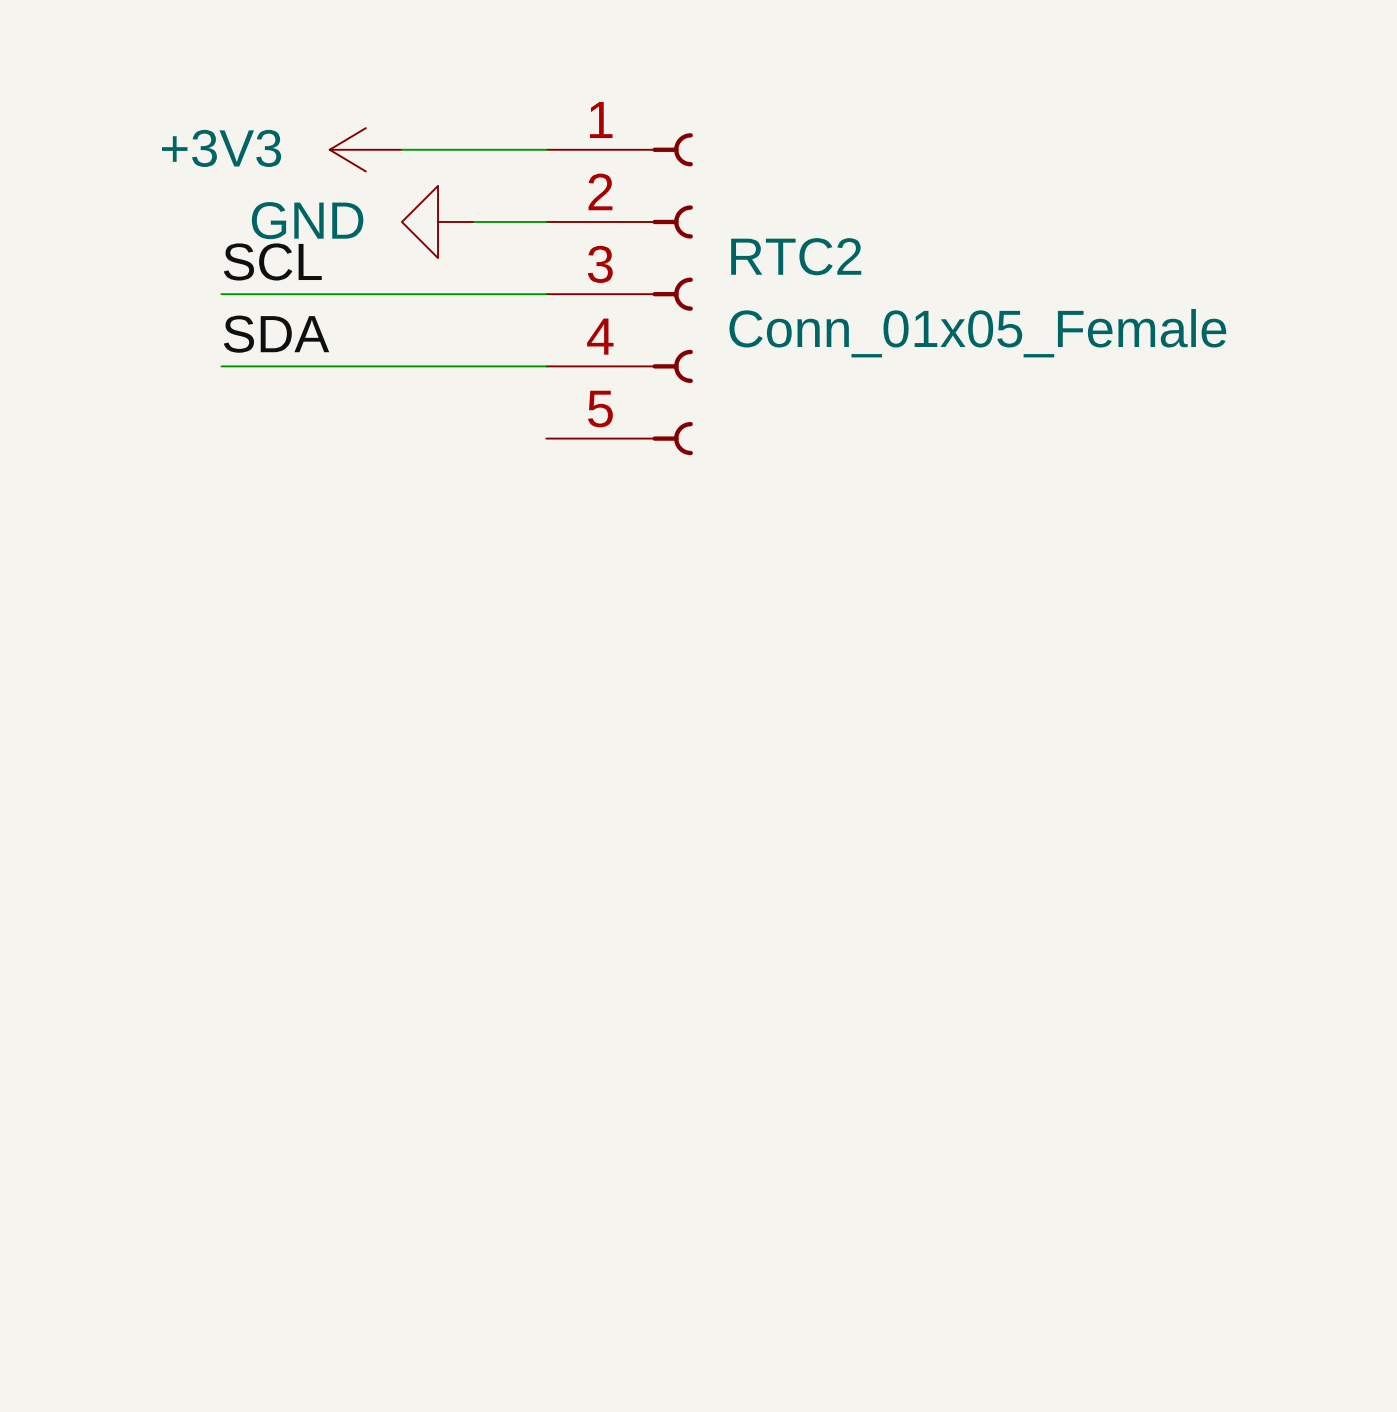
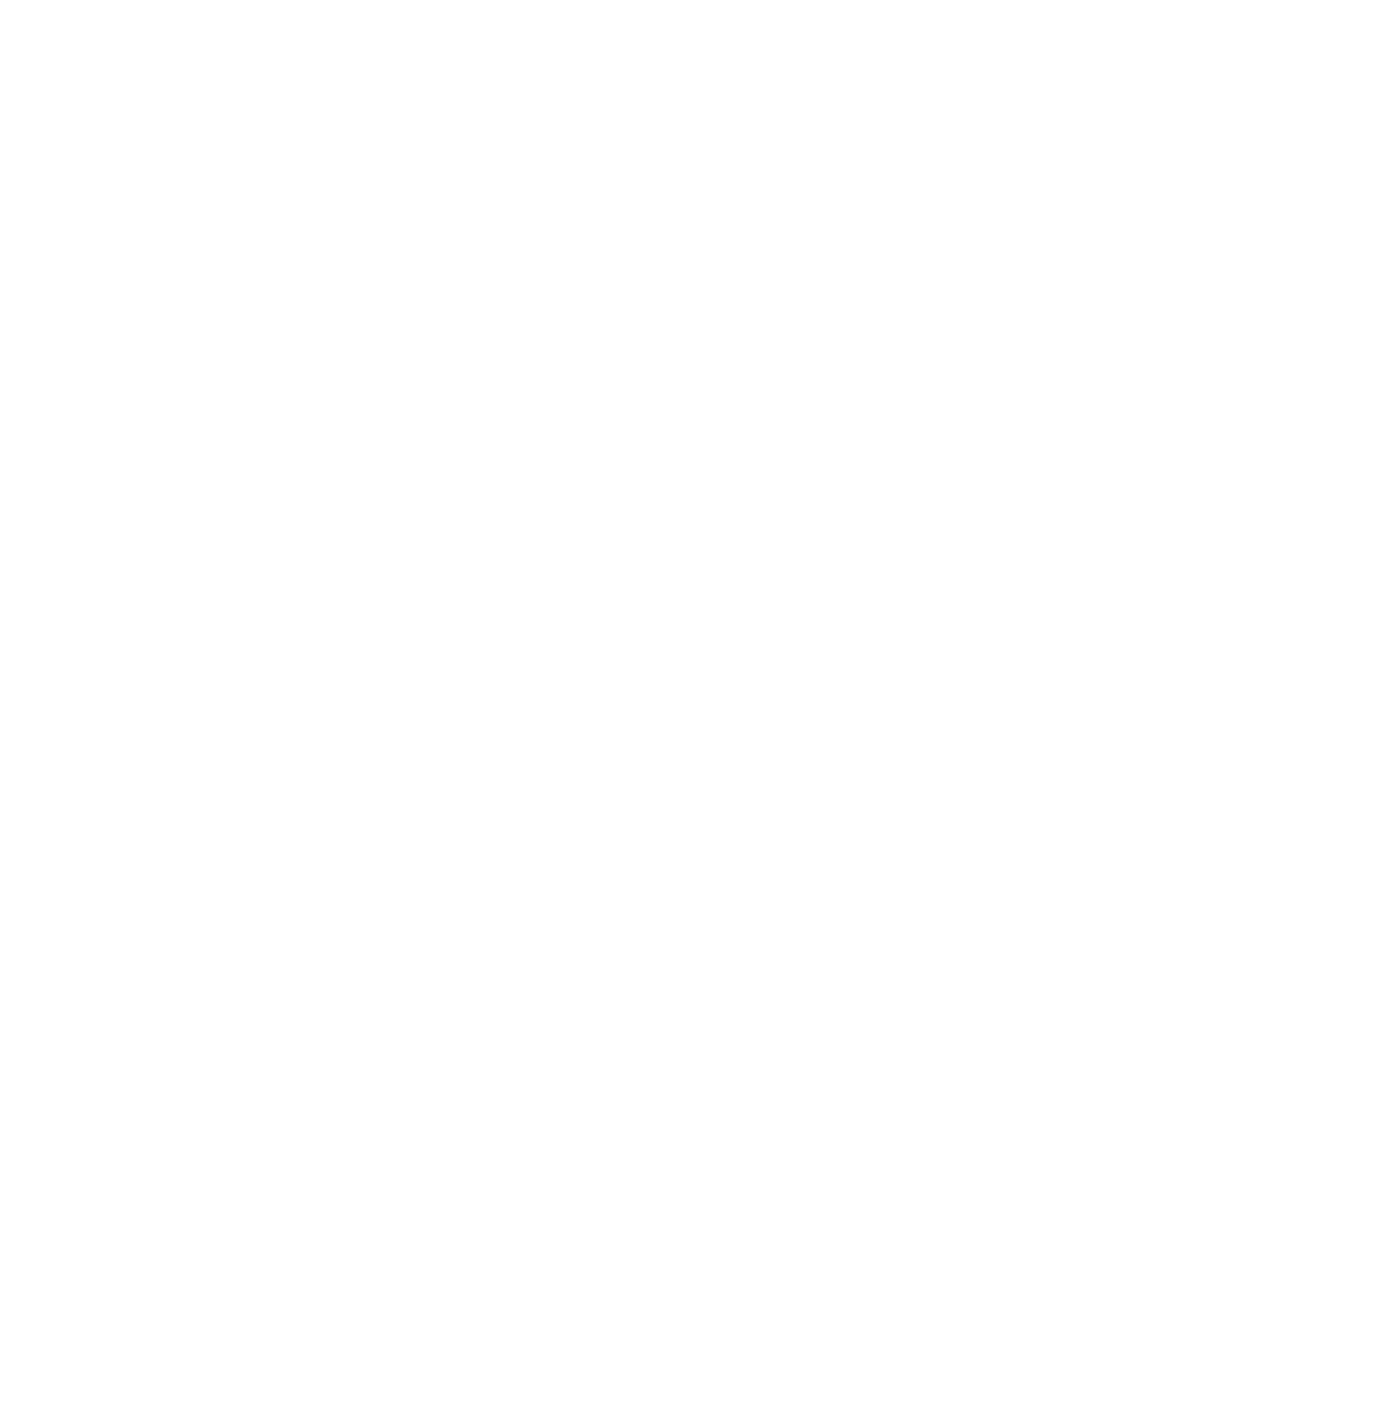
power symbol: +3V3 (365, 149) -> none
wire: (401, 149) (546, 149) -> none
power symbol: GND (438, 221) -> none
wire: (474, 221) (546, 221) -> none
label: SCL (272, 261) -> none
wire: (221, 294) (546, 294) -> none
RTC2: Conn_01x05_Female (619, 294) -> none
label: SDA (276, 334) -> none
wire: (221, 366) (546, 366) -> none

